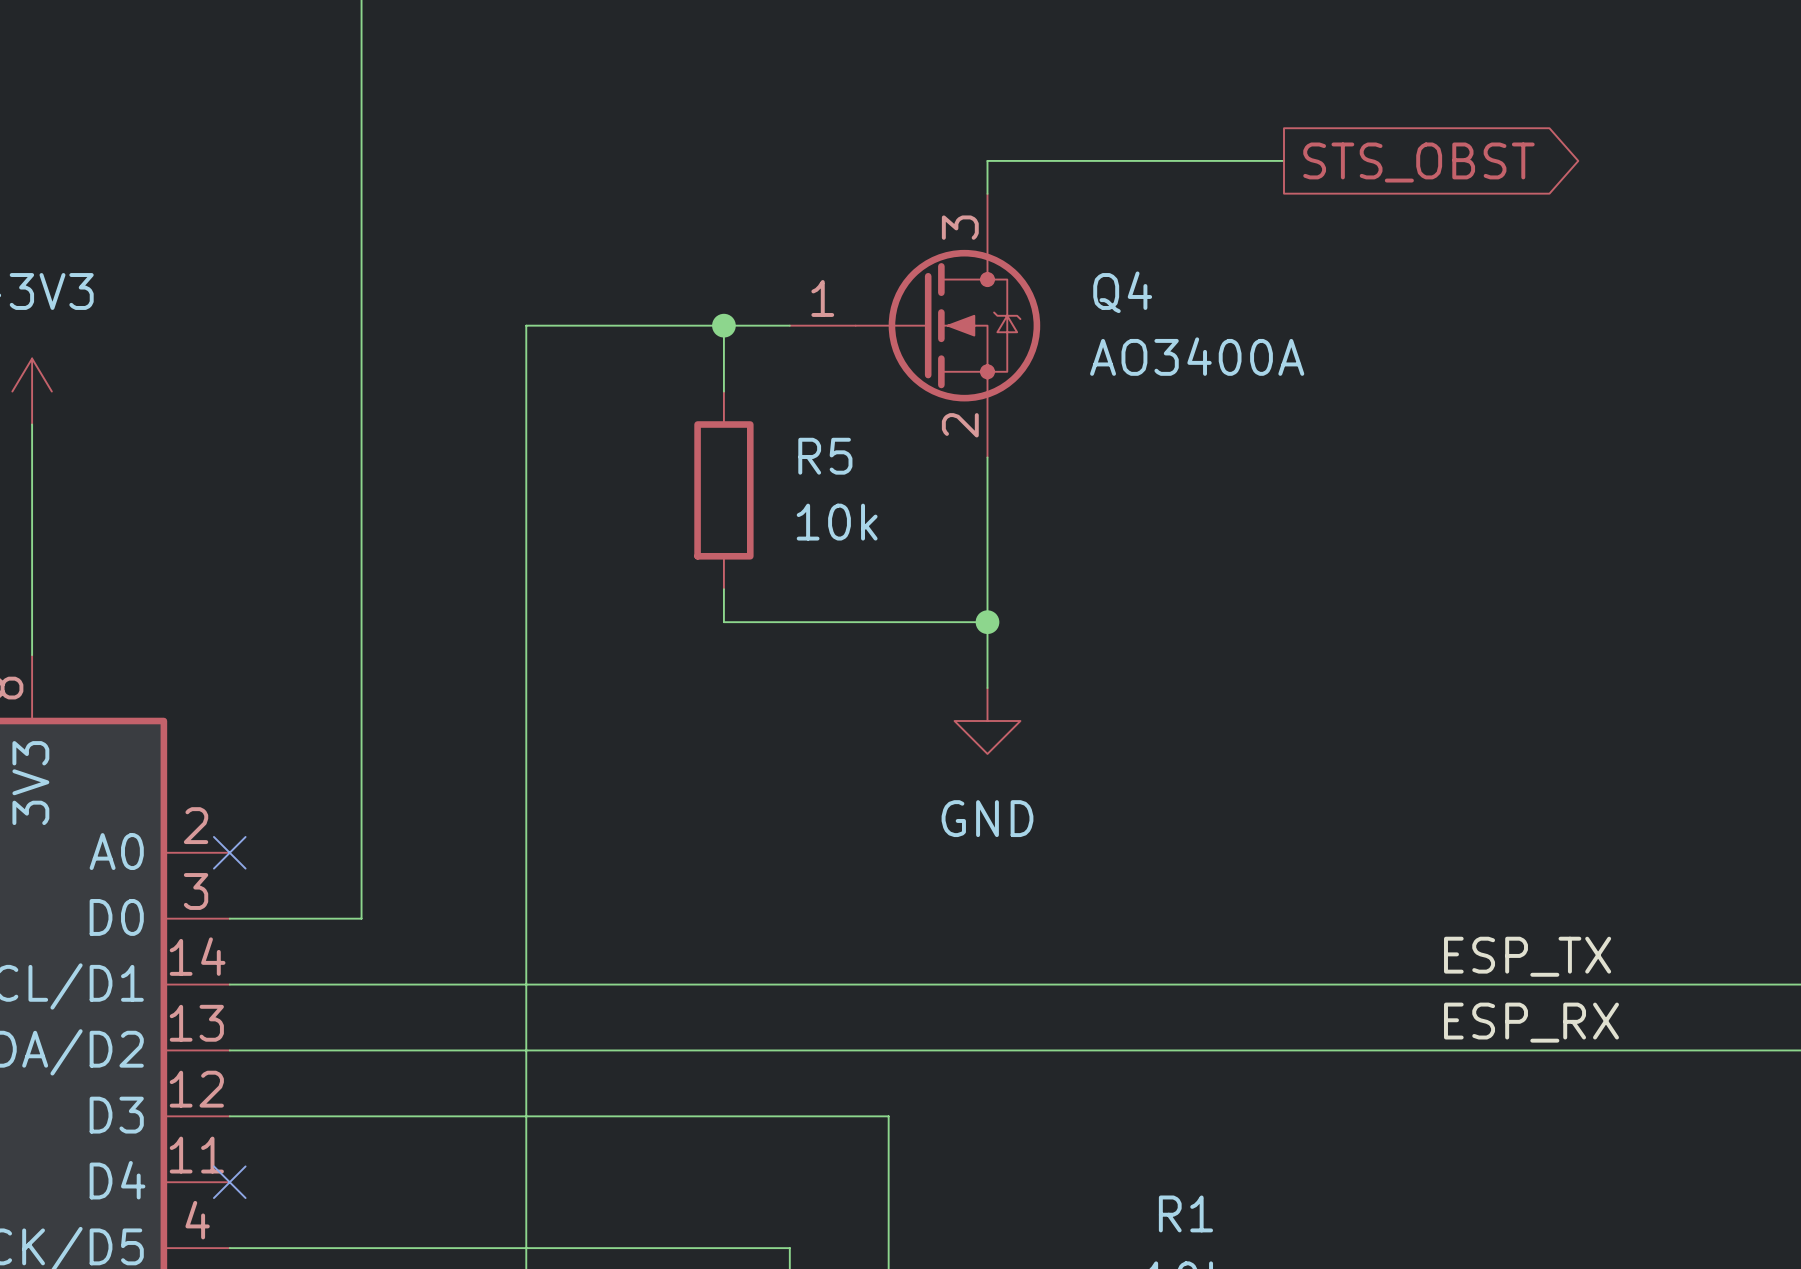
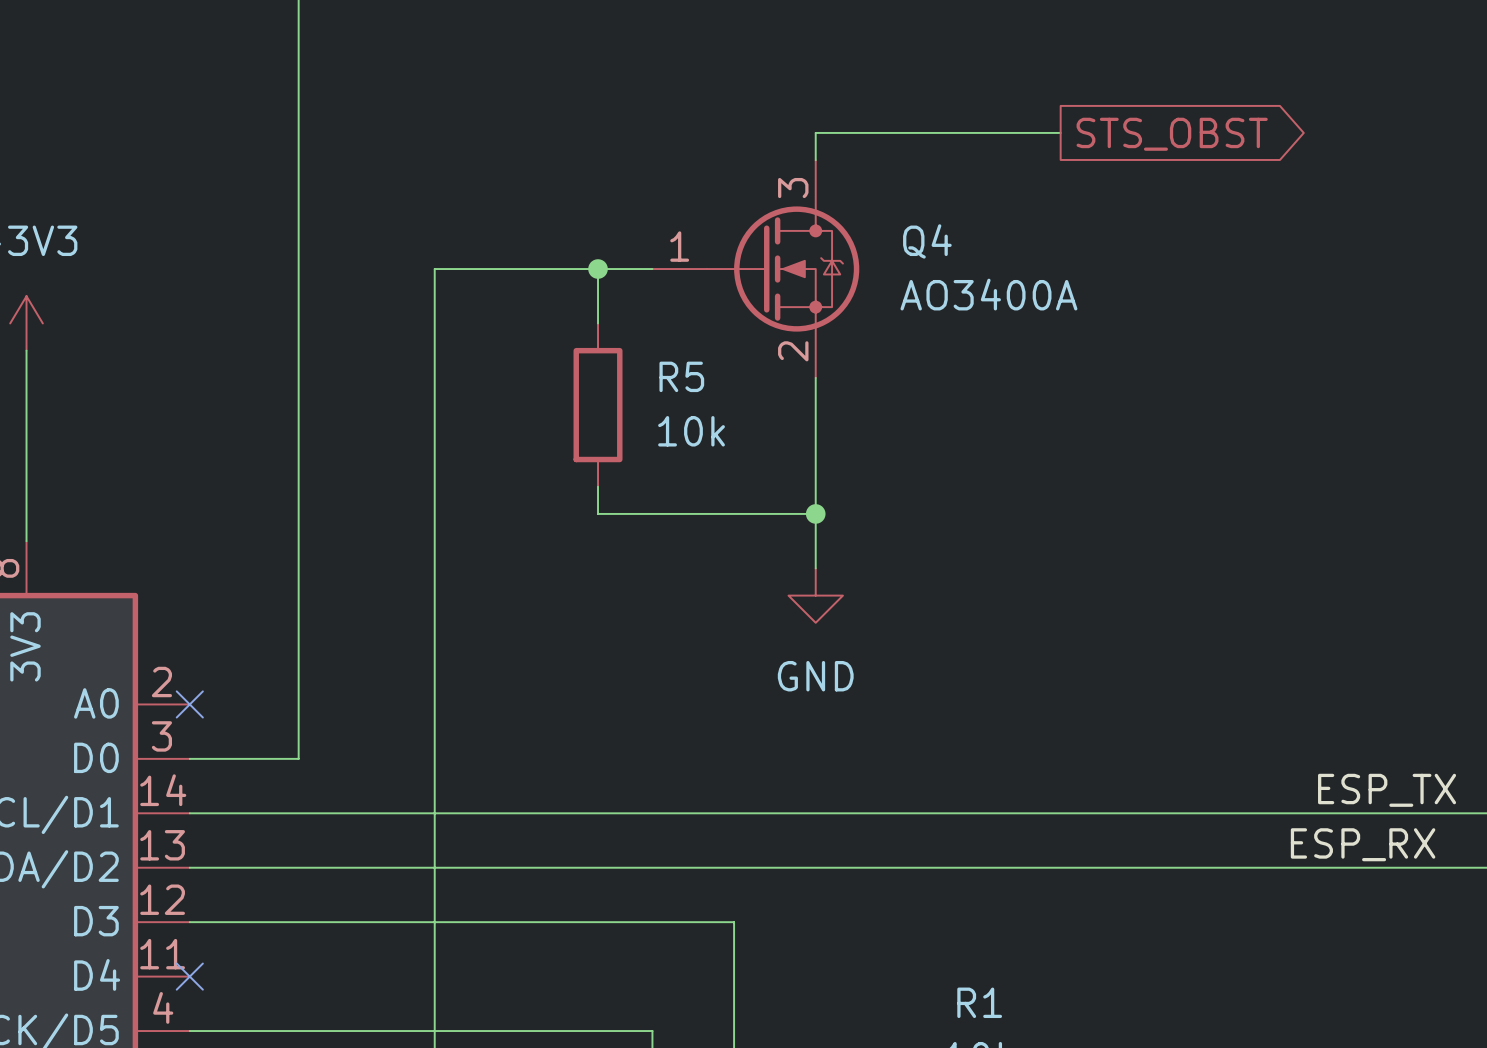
label position: ESP_TX (1527, 956) -> ESP_TX (1387, 790)
label position: ESP_RX (1531, 1022) -> ESP_RX (1363, 844)

